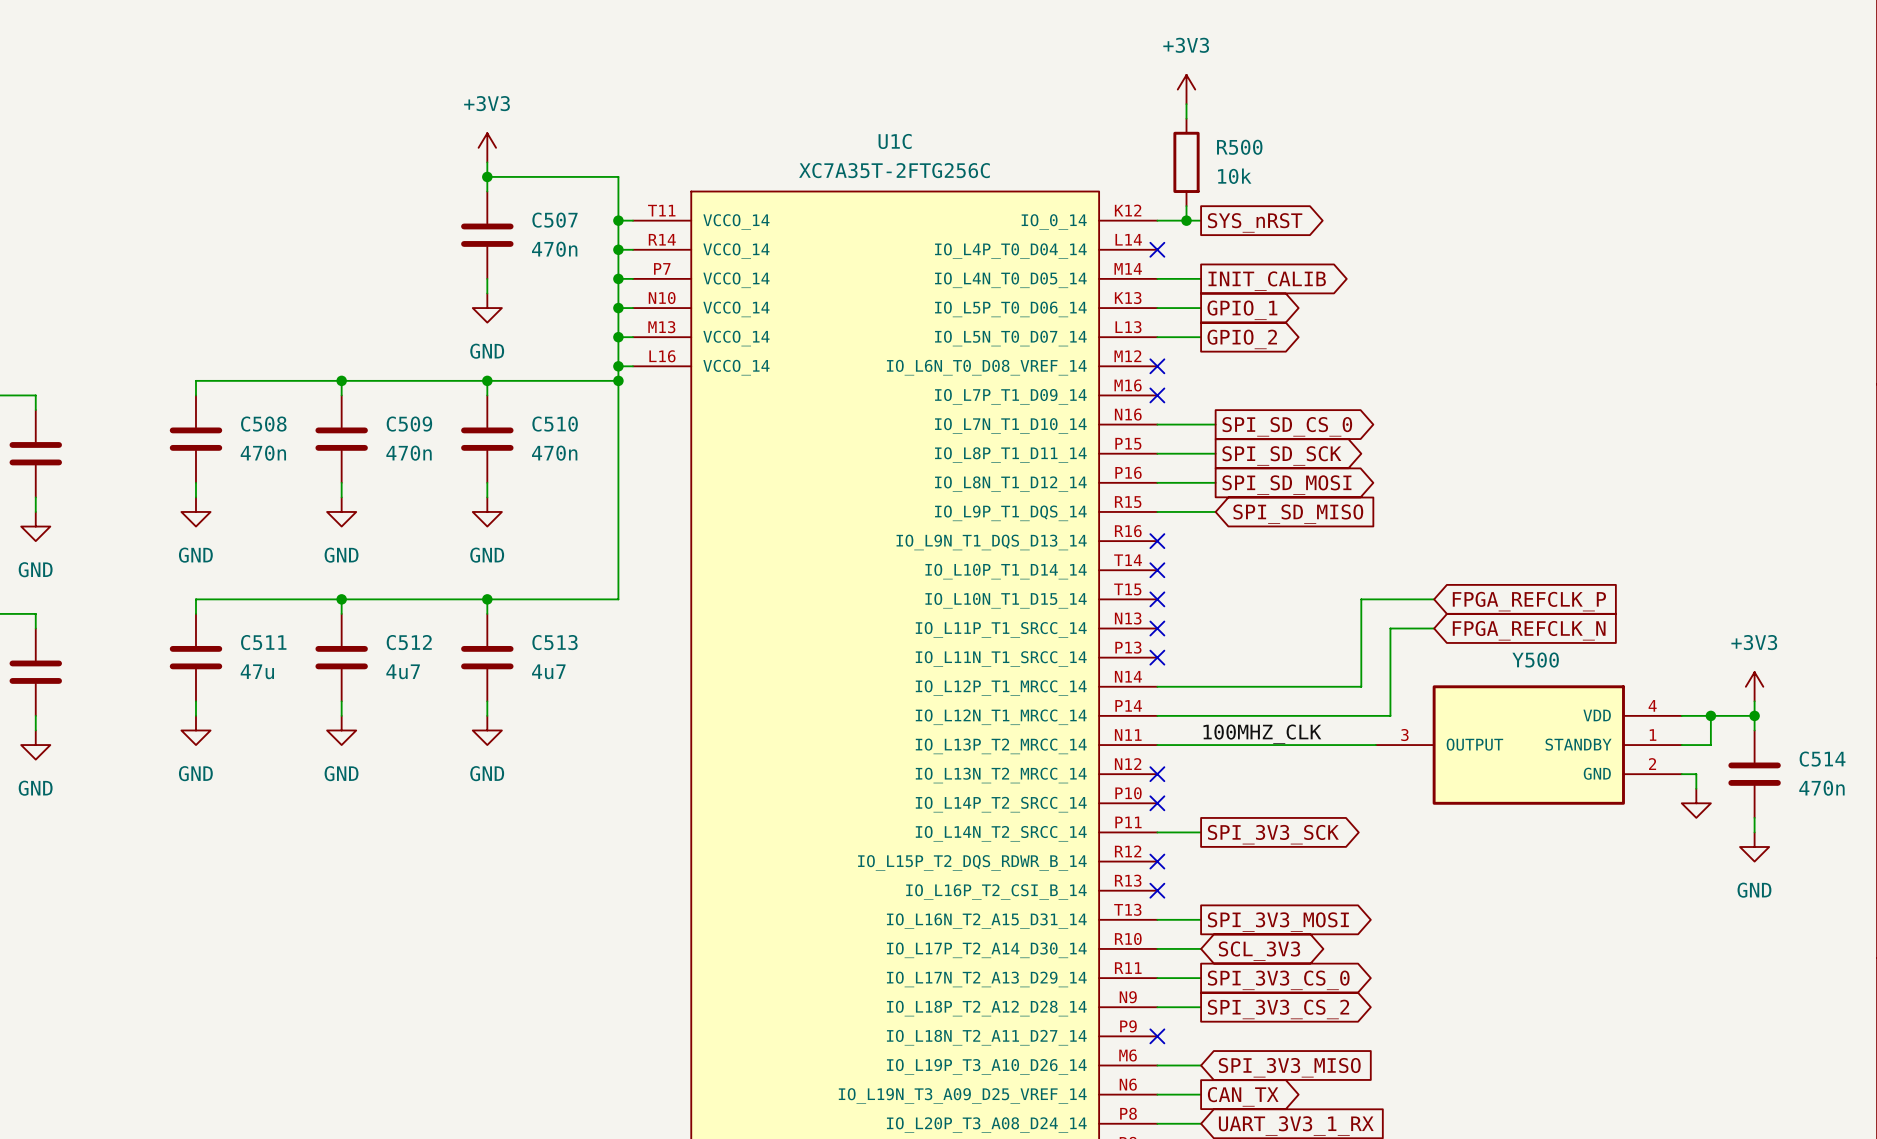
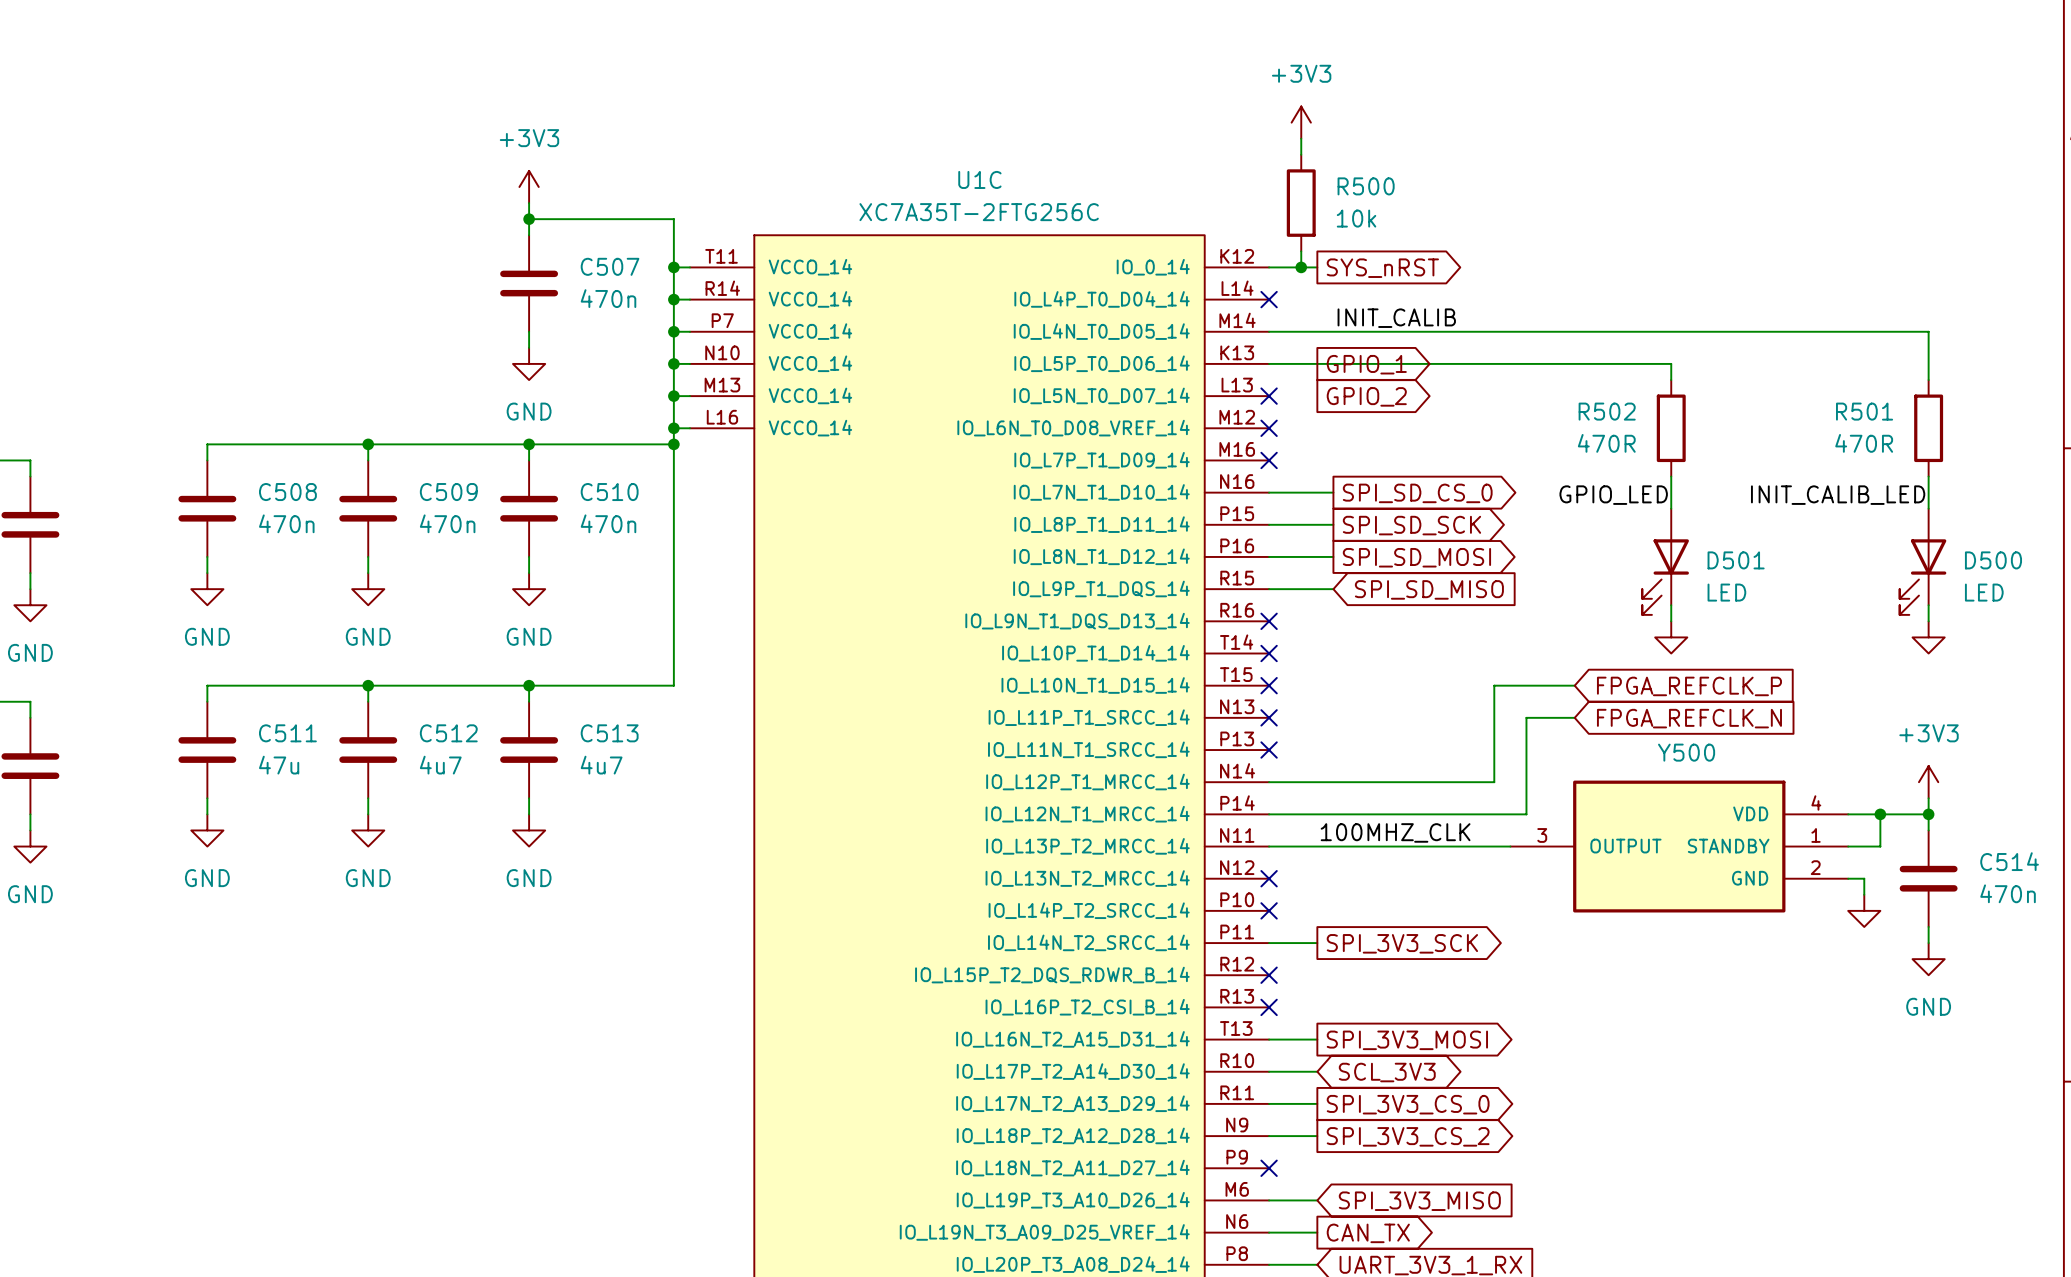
label: none -> INIT_CALIB (1396, 318)
wire: none -> (1317, 331) (1928, 331) (1928, 380)
global label: INIT_CALIB (1267, 281) -> none
wire: none -> (1317, 363) (1671, 363) (1671, 380)
wire: (1157, 337) (1201, 337) -> none
no-connect mark: none -> (1269, 396)
R502: none -> 470R (1671, 428)
R501: none -> 470R (1928, 428)
wire: none -> (1671, 476) (1671, 508)
wire: none -> (1928, 476) (1928, 508)
label: none -> GPIO_LED (1613, 495)
label: none -> INIT_CALIB_LED (1838, 495)
D501: none -> LED (1665, 561)
D500: none -> LED (1922, 561)
wire: none -> (1671, 605) (1671, 621)
wire: none -> (1928, 605) (1928, 621)
power symbol: none -> (1671, 637)
power symbol: none -> (1928, 637)

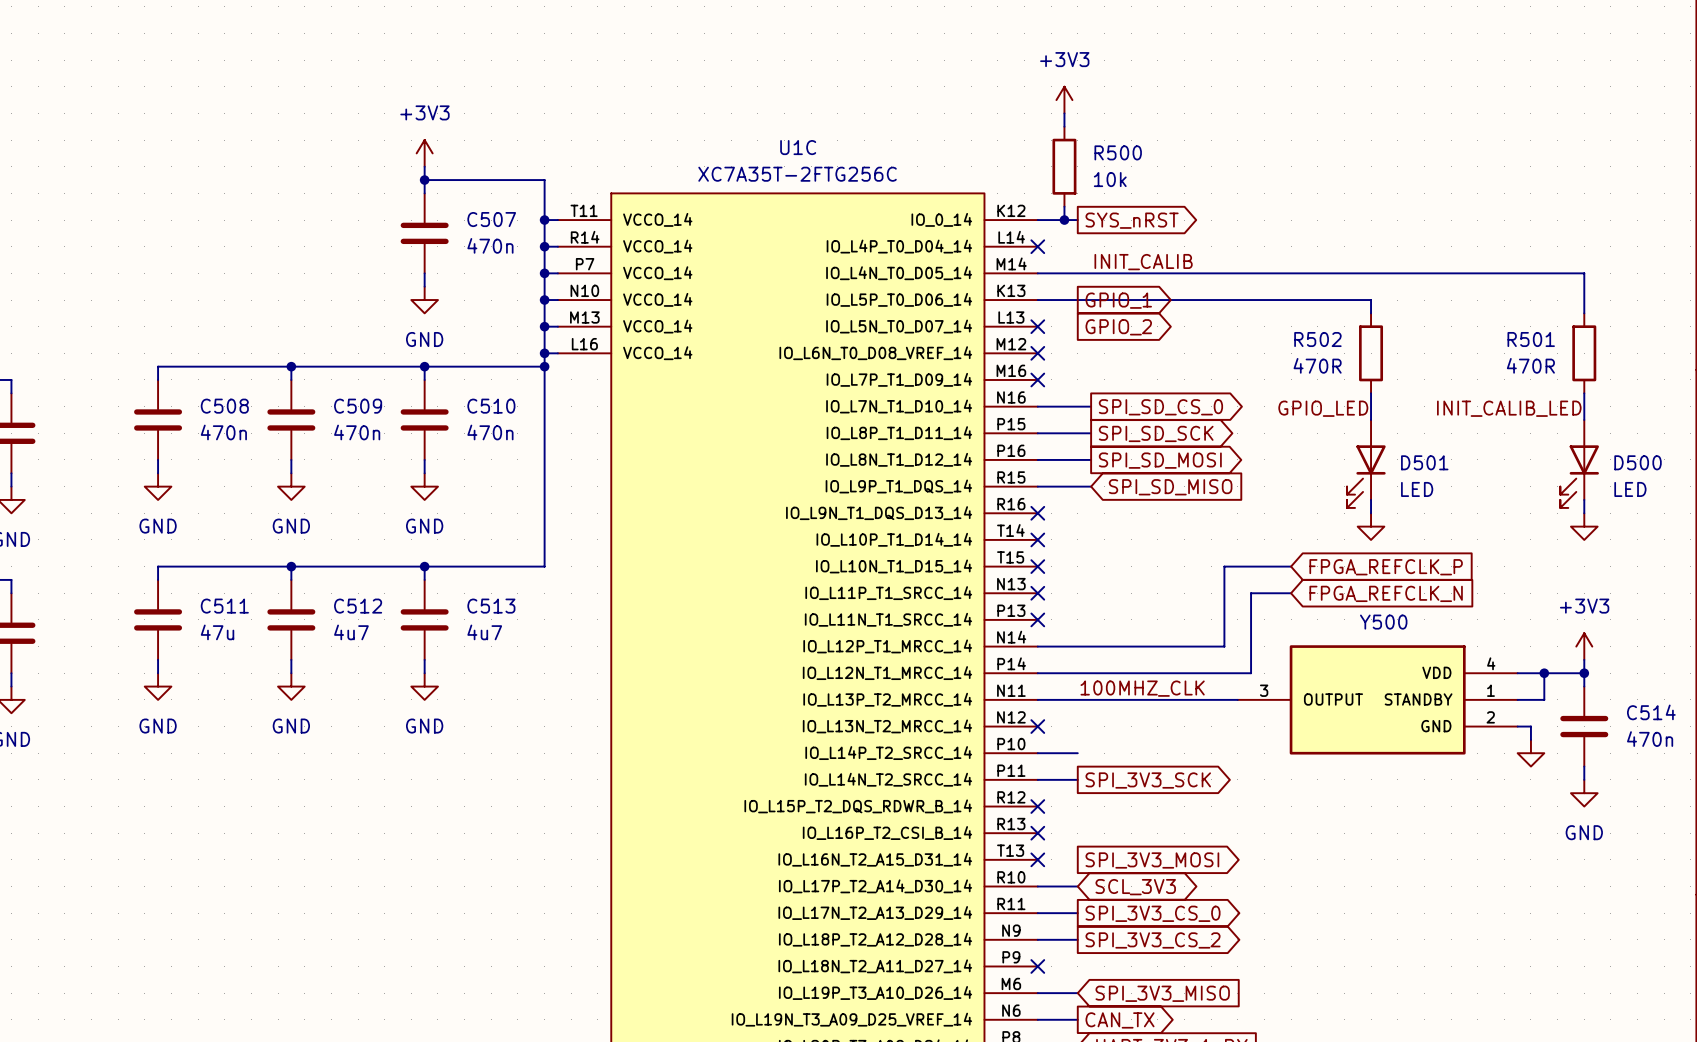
no-connect mark: (1269, 910) -> none
wire: (1269, 1039) (1317, 1039) -> (1037, 753) (1077, 753)
no-connect mark: none -> (1037, 859)

